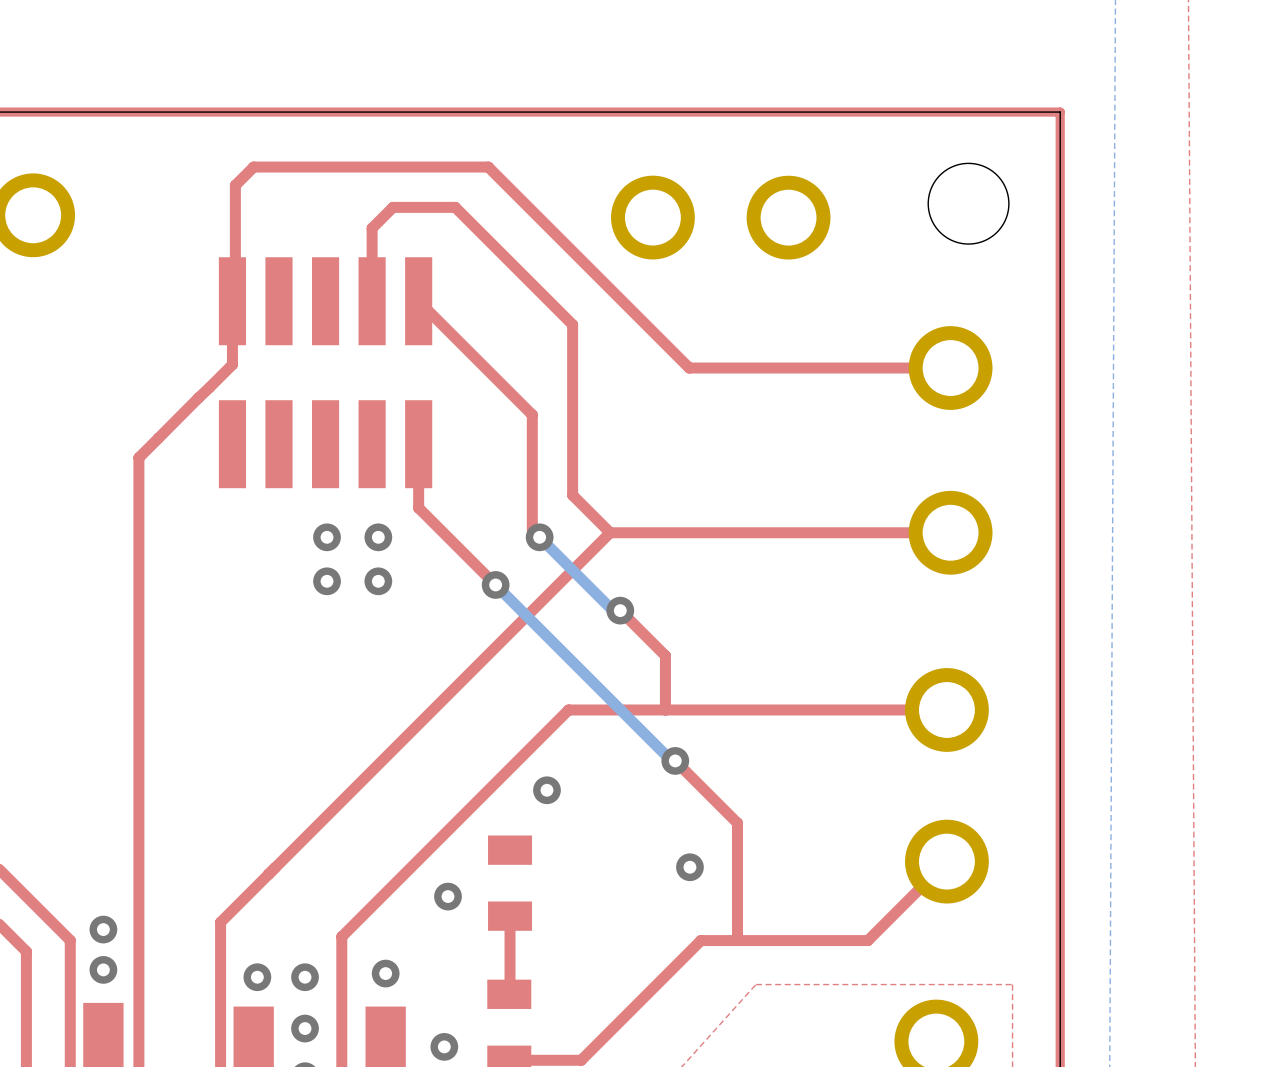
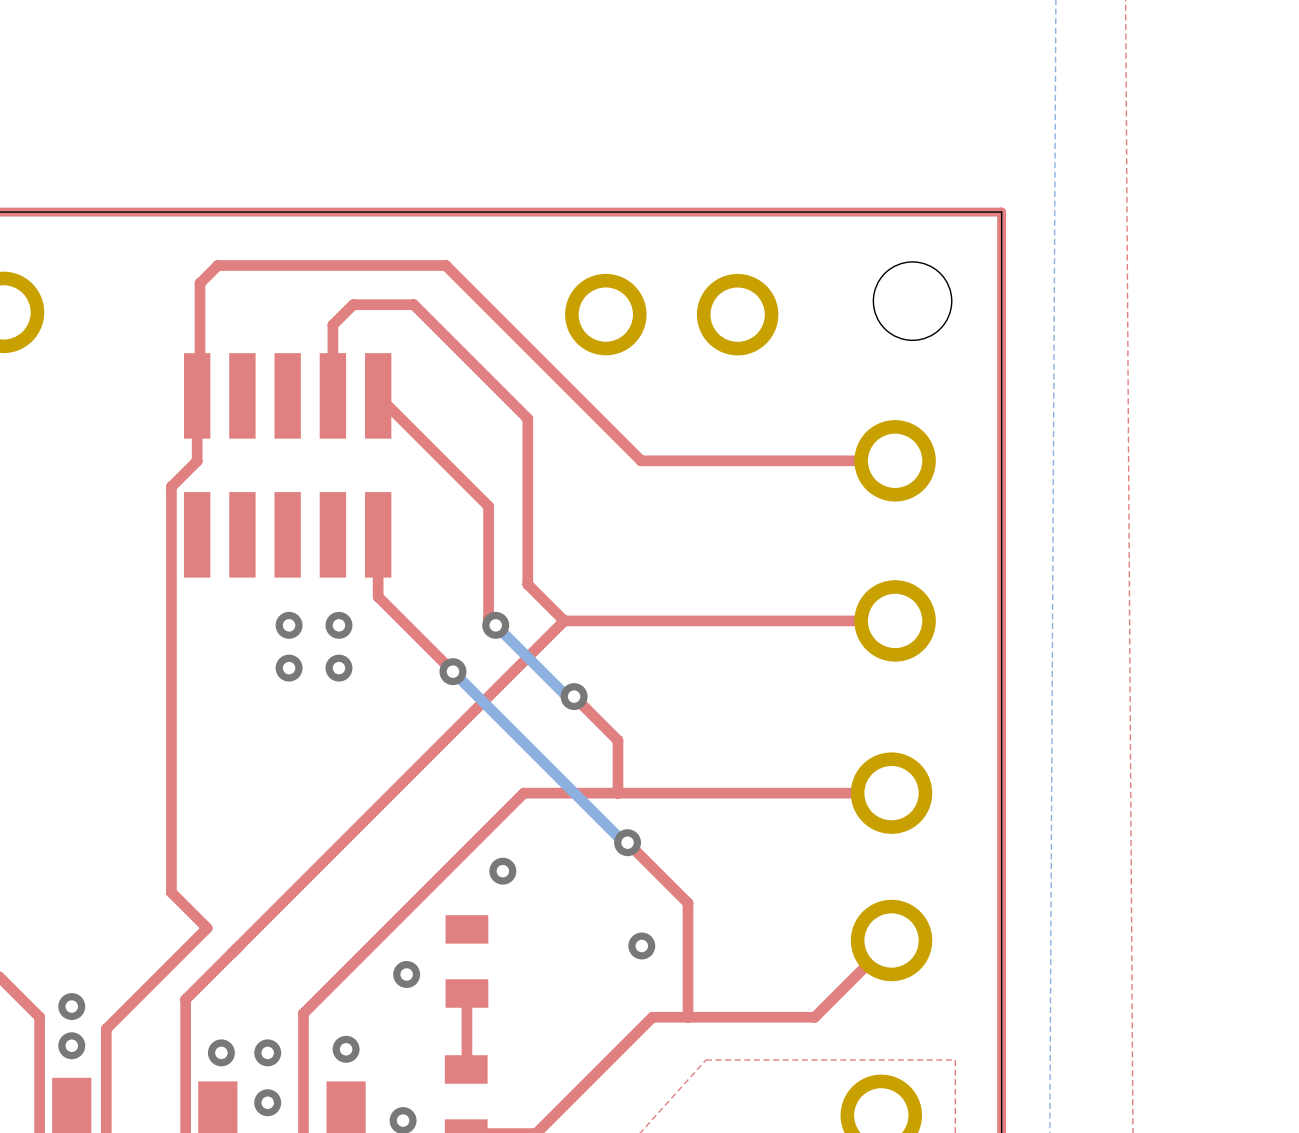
top track: (232, 364) (138, 457) (138, 952) -> (197, 457) (197, 461) (171, 486) (171, 892) (207, 928) (106, 1029)

